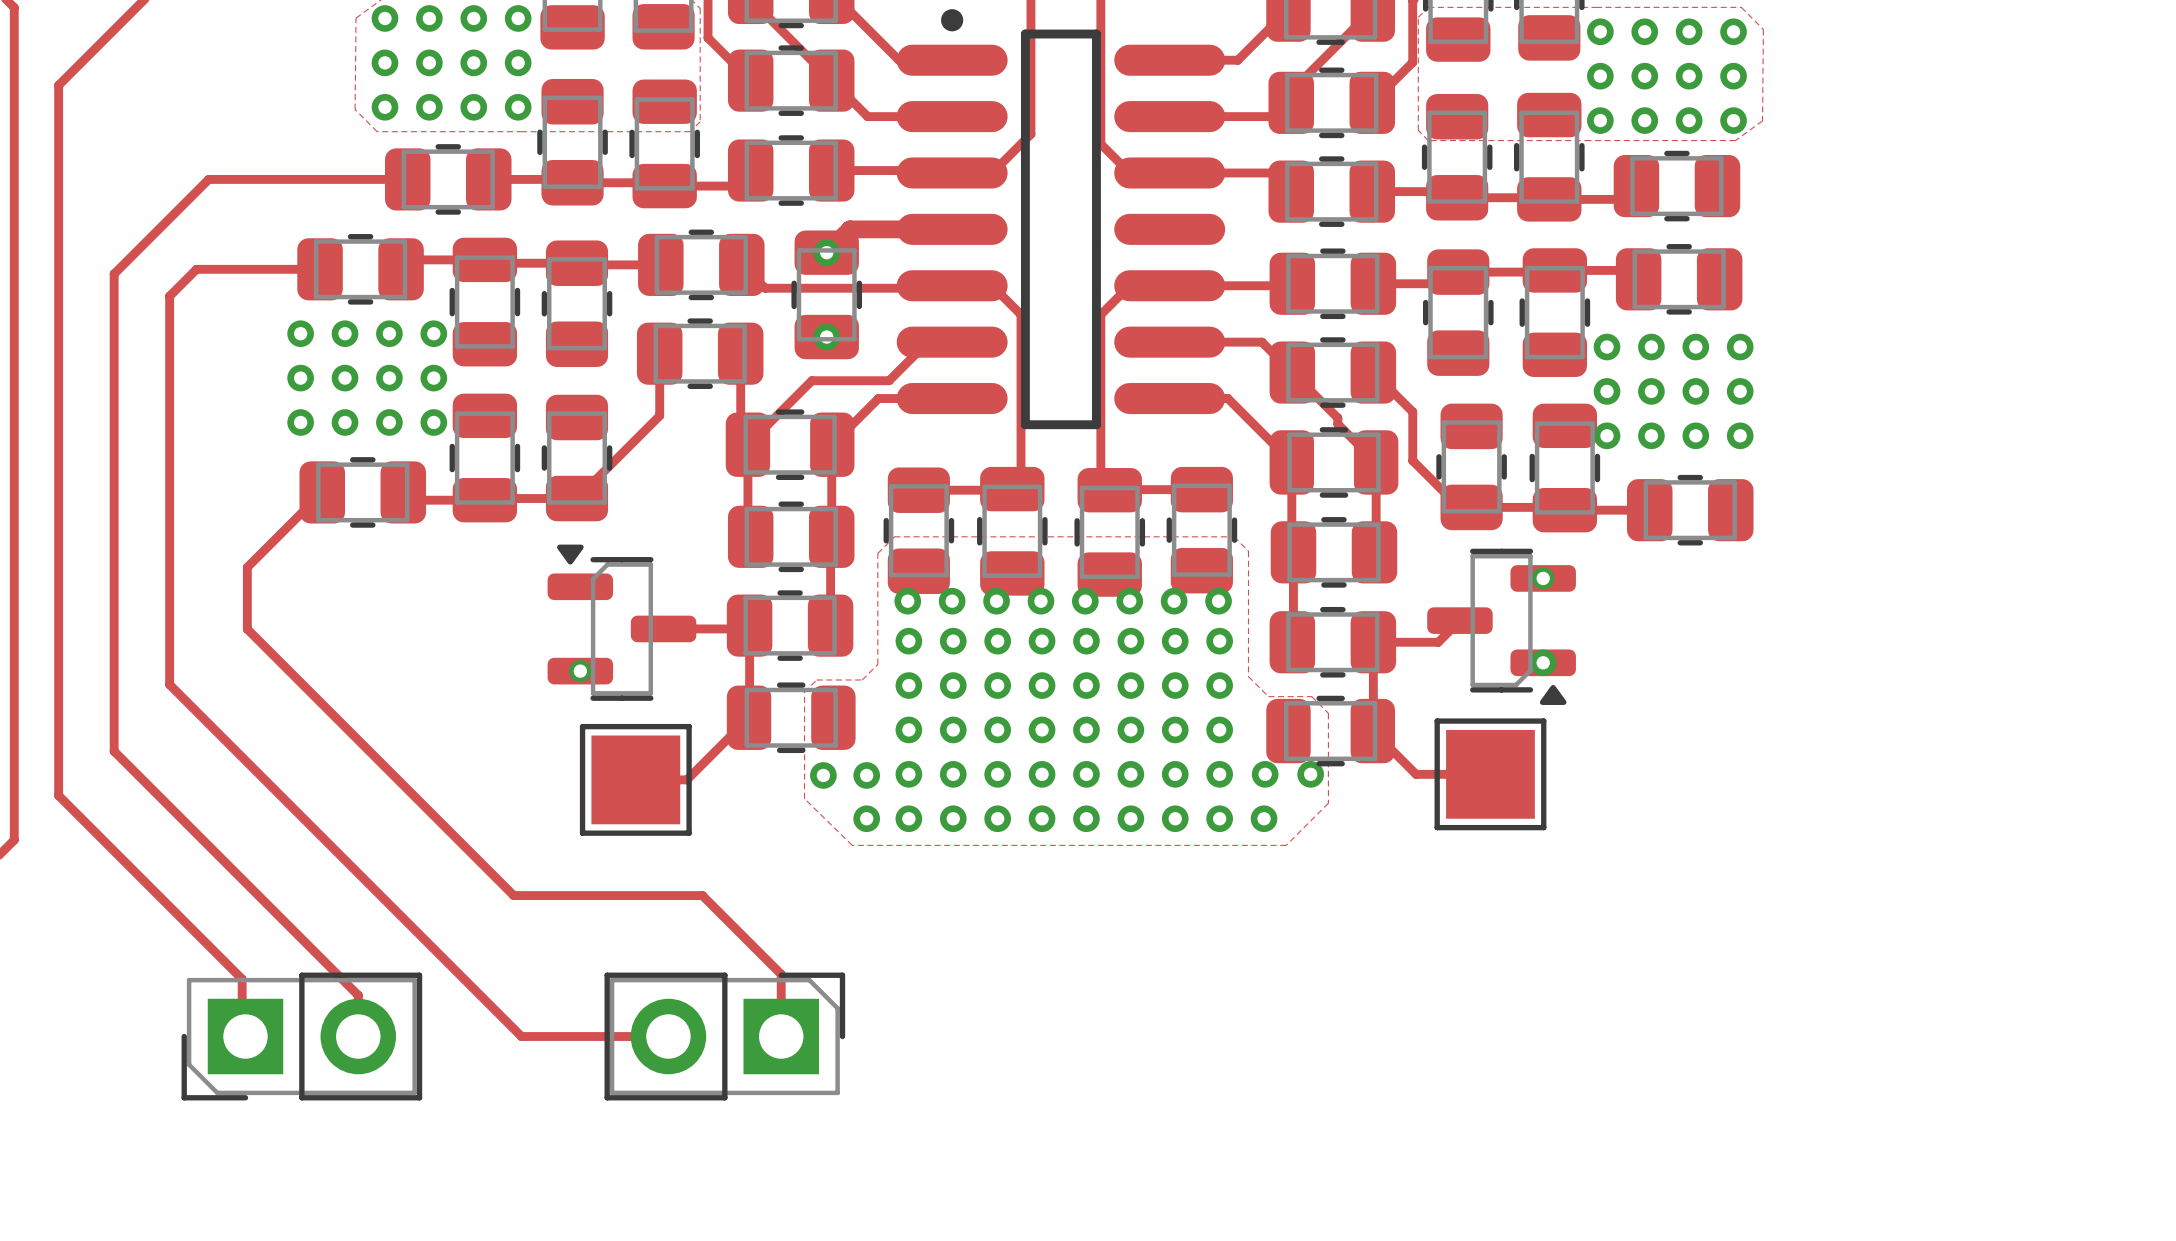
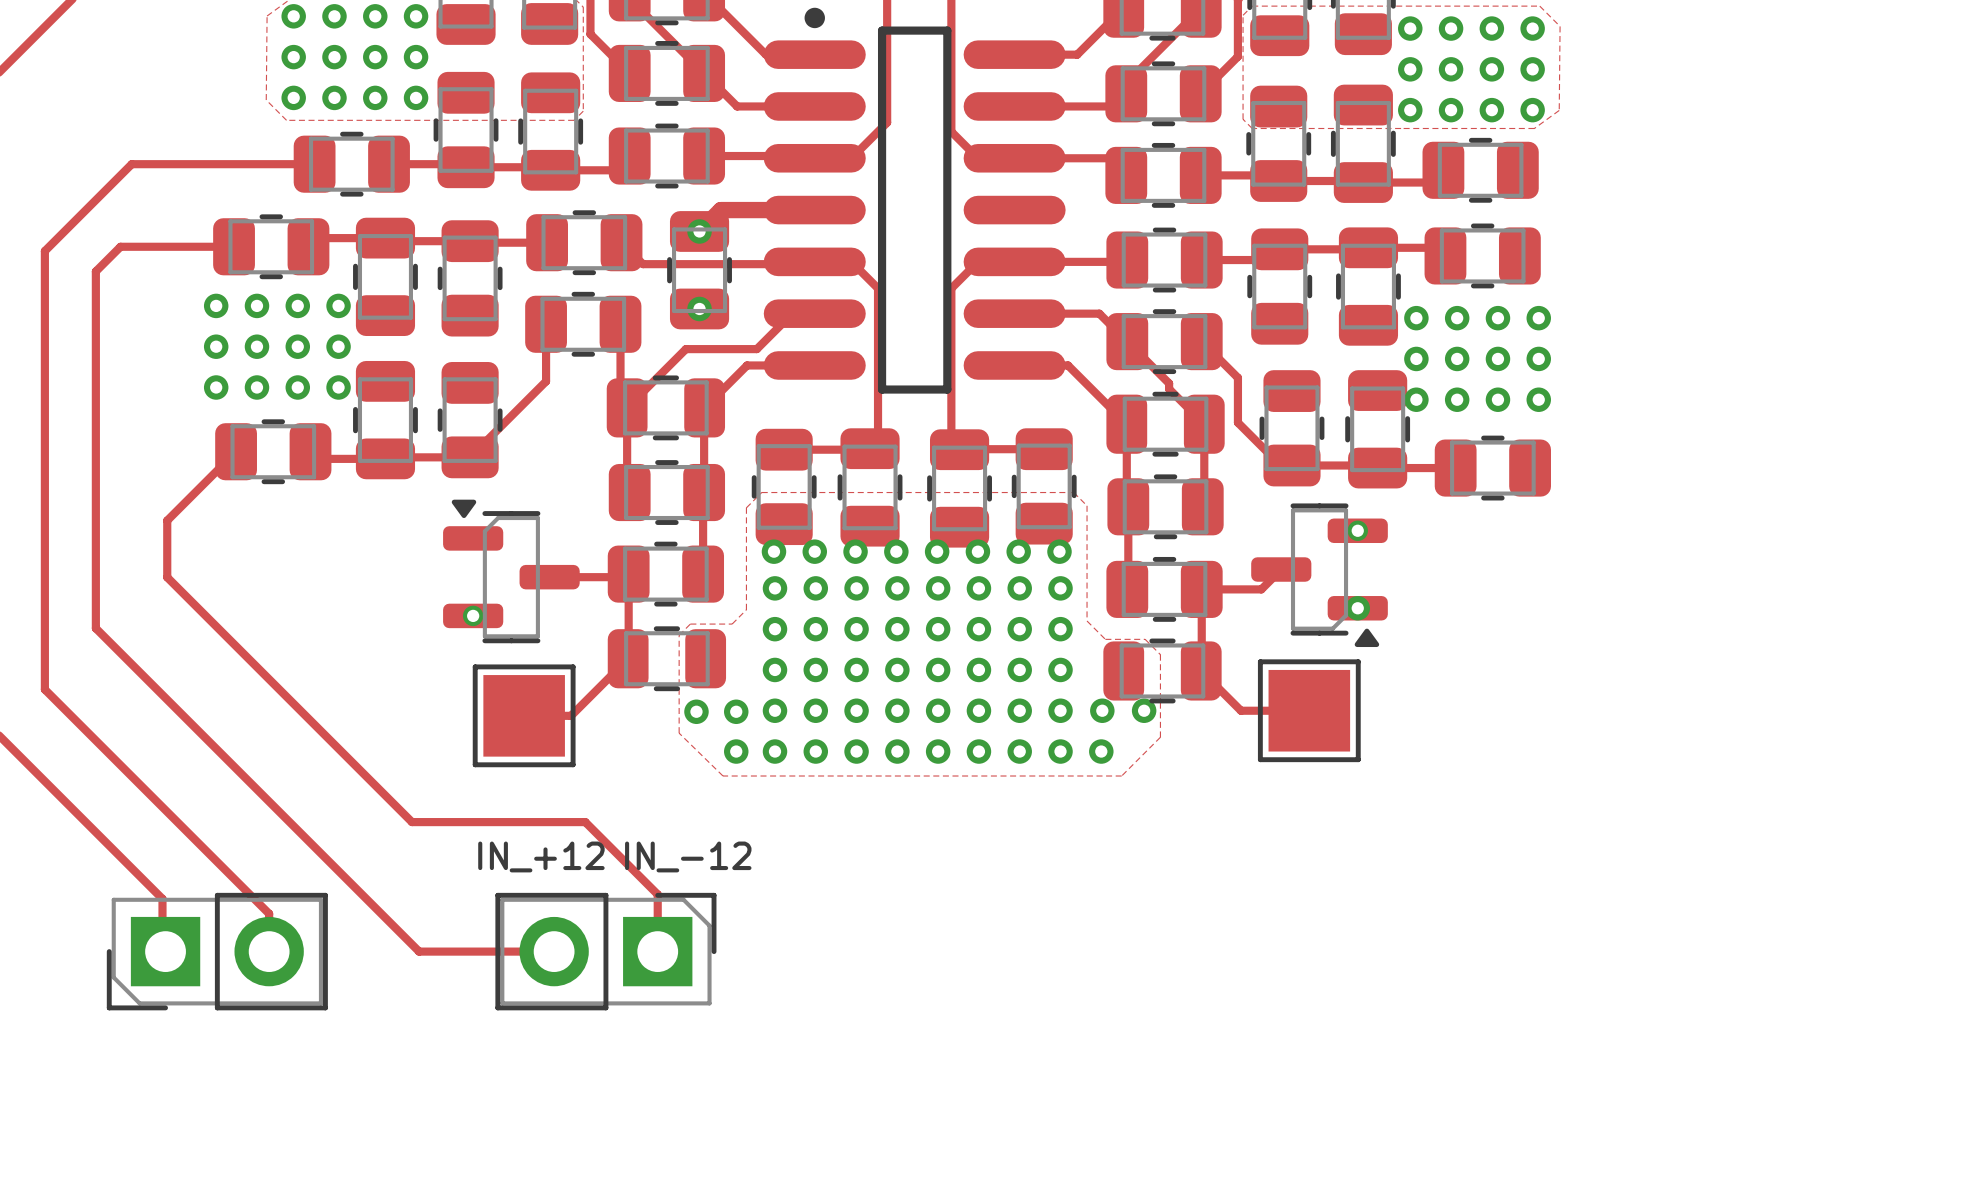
text: none -> IN_+12 (541, 856)
text: none -> IN_-12 (688, 856)

